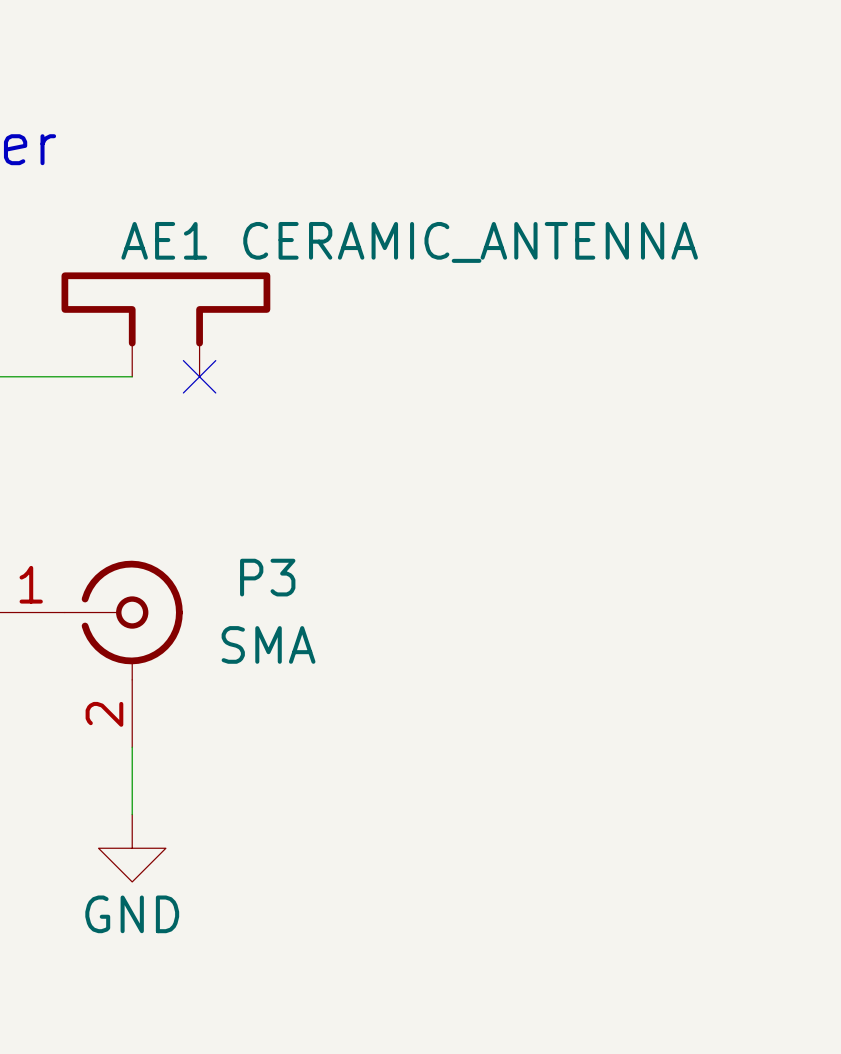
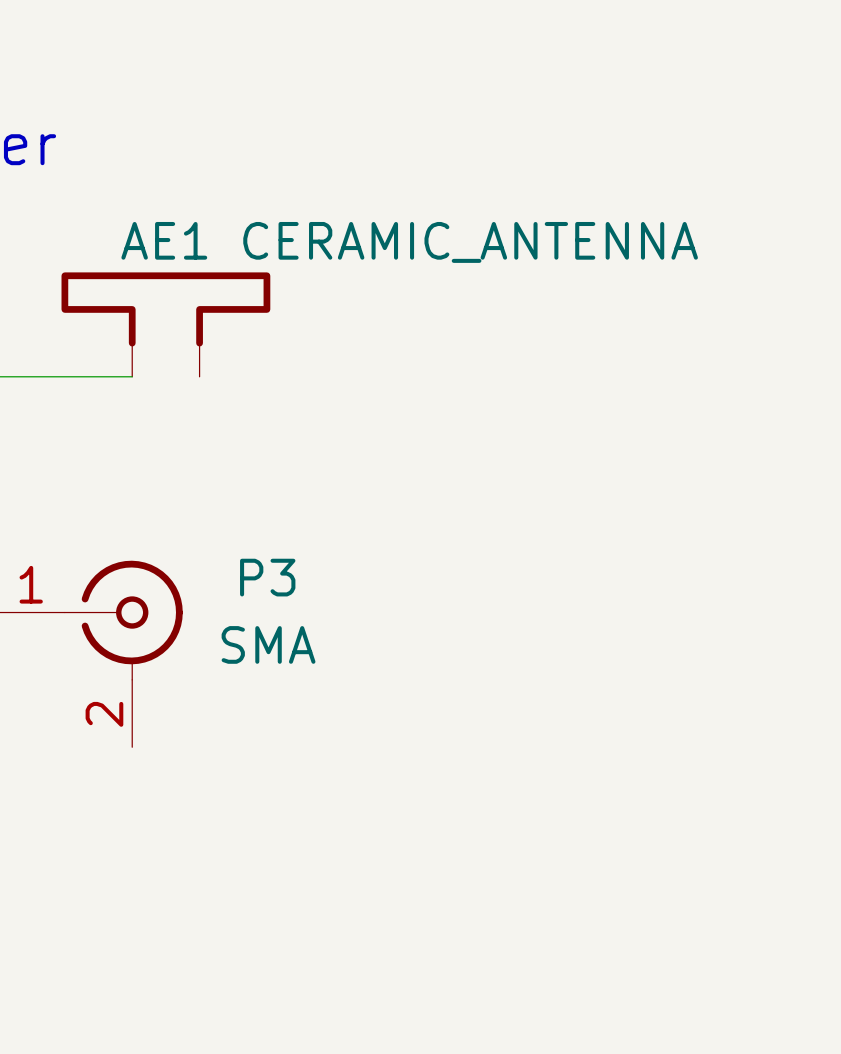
no-connect mark: (199, 376) -> none
wire: (132, 747) (132, 814) -> none
power symbol: GND (132, 848) -> none

